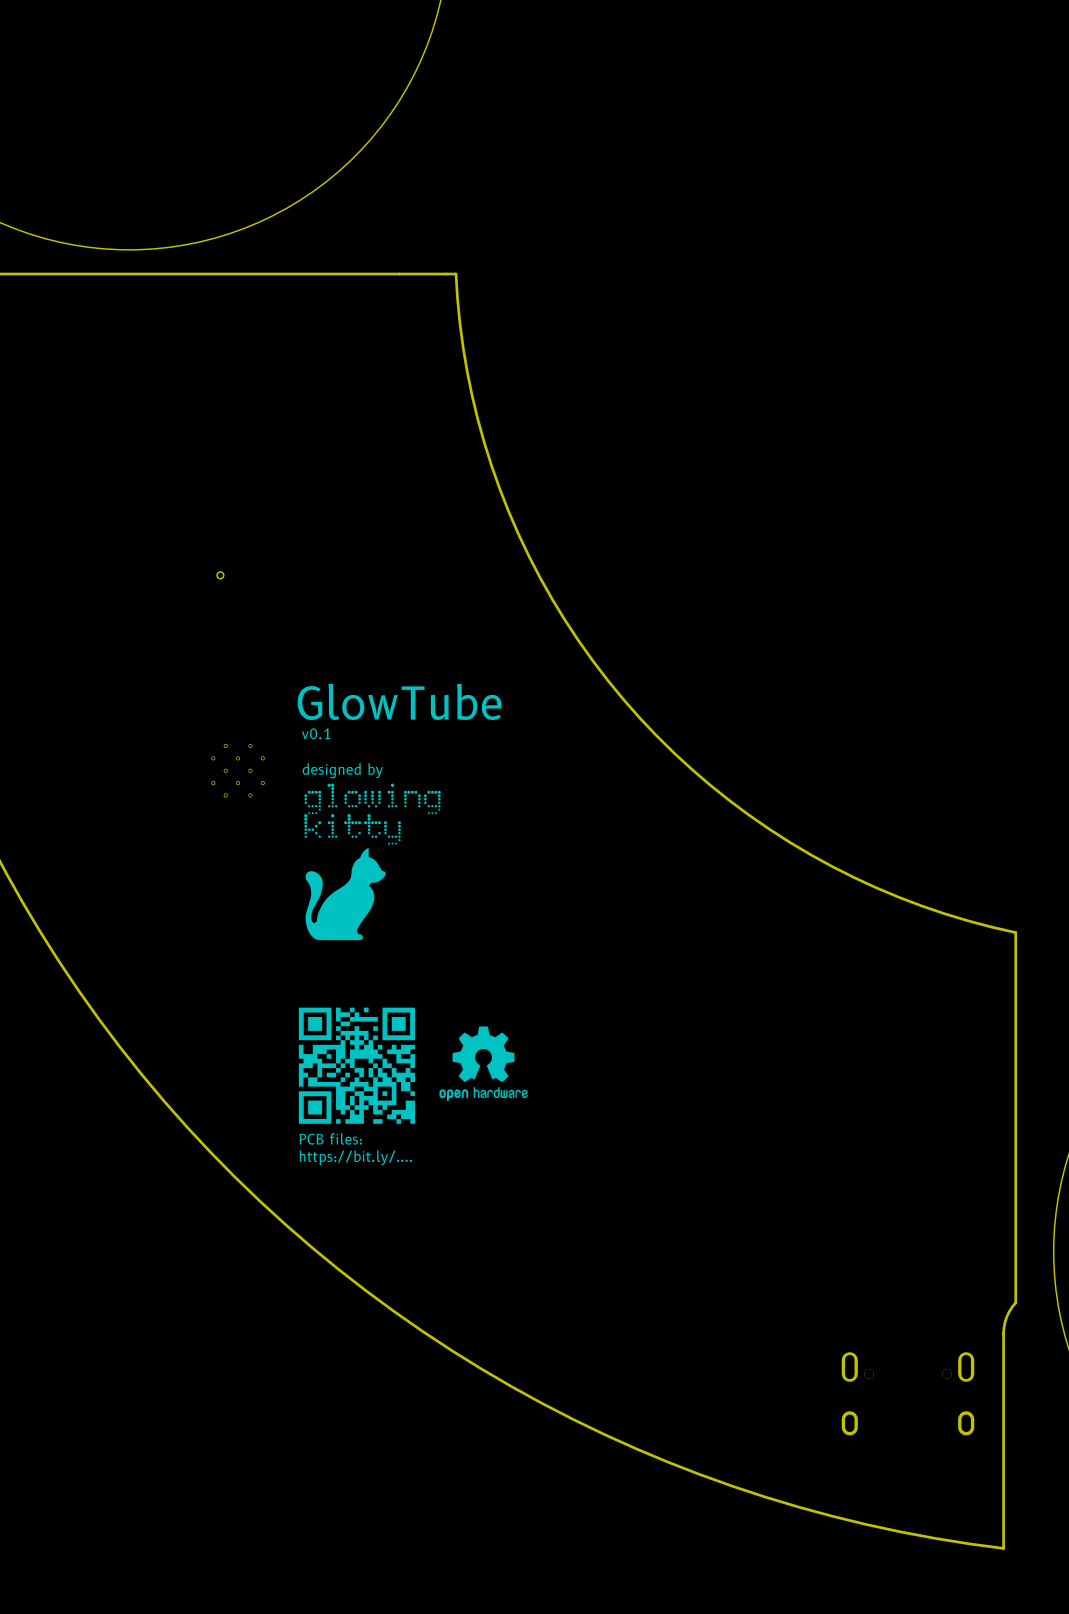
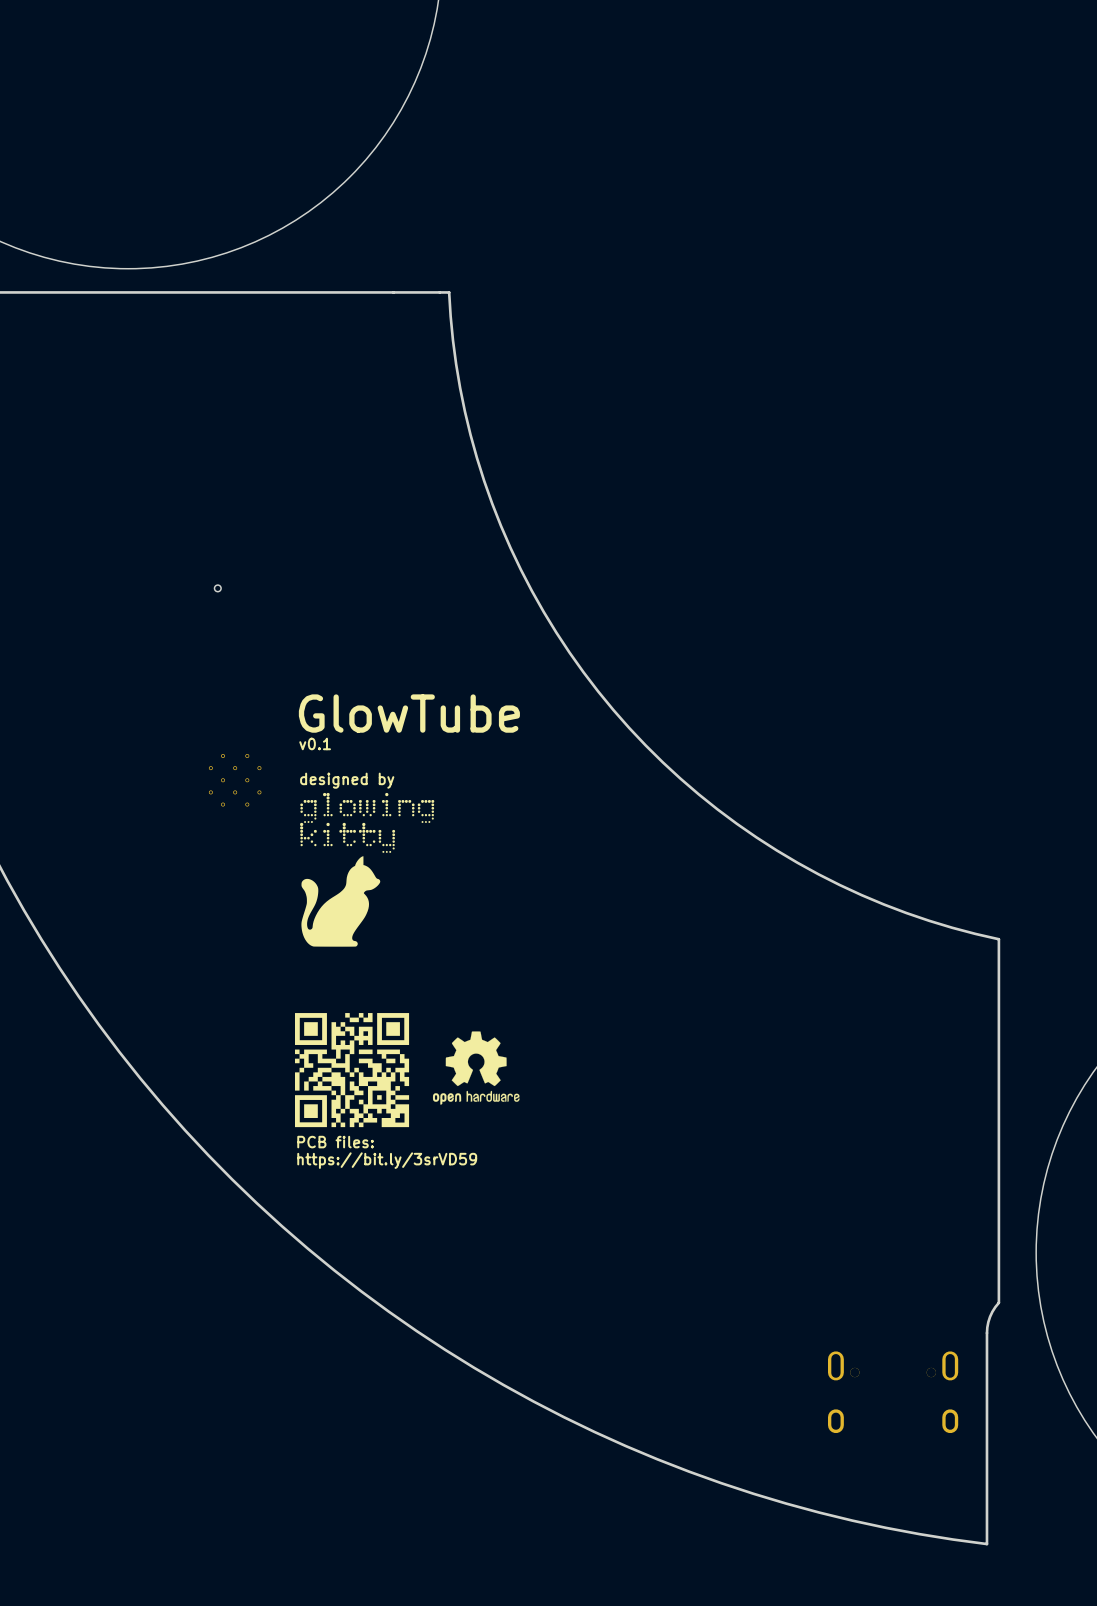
drawing shape: [298, 1007, 416, 1124] -> [295, 1013, 410, 1128]
text: https://bit.ly/.... (355, 1157) -> https://bit.ly/3srVD59 (387, 1160)

